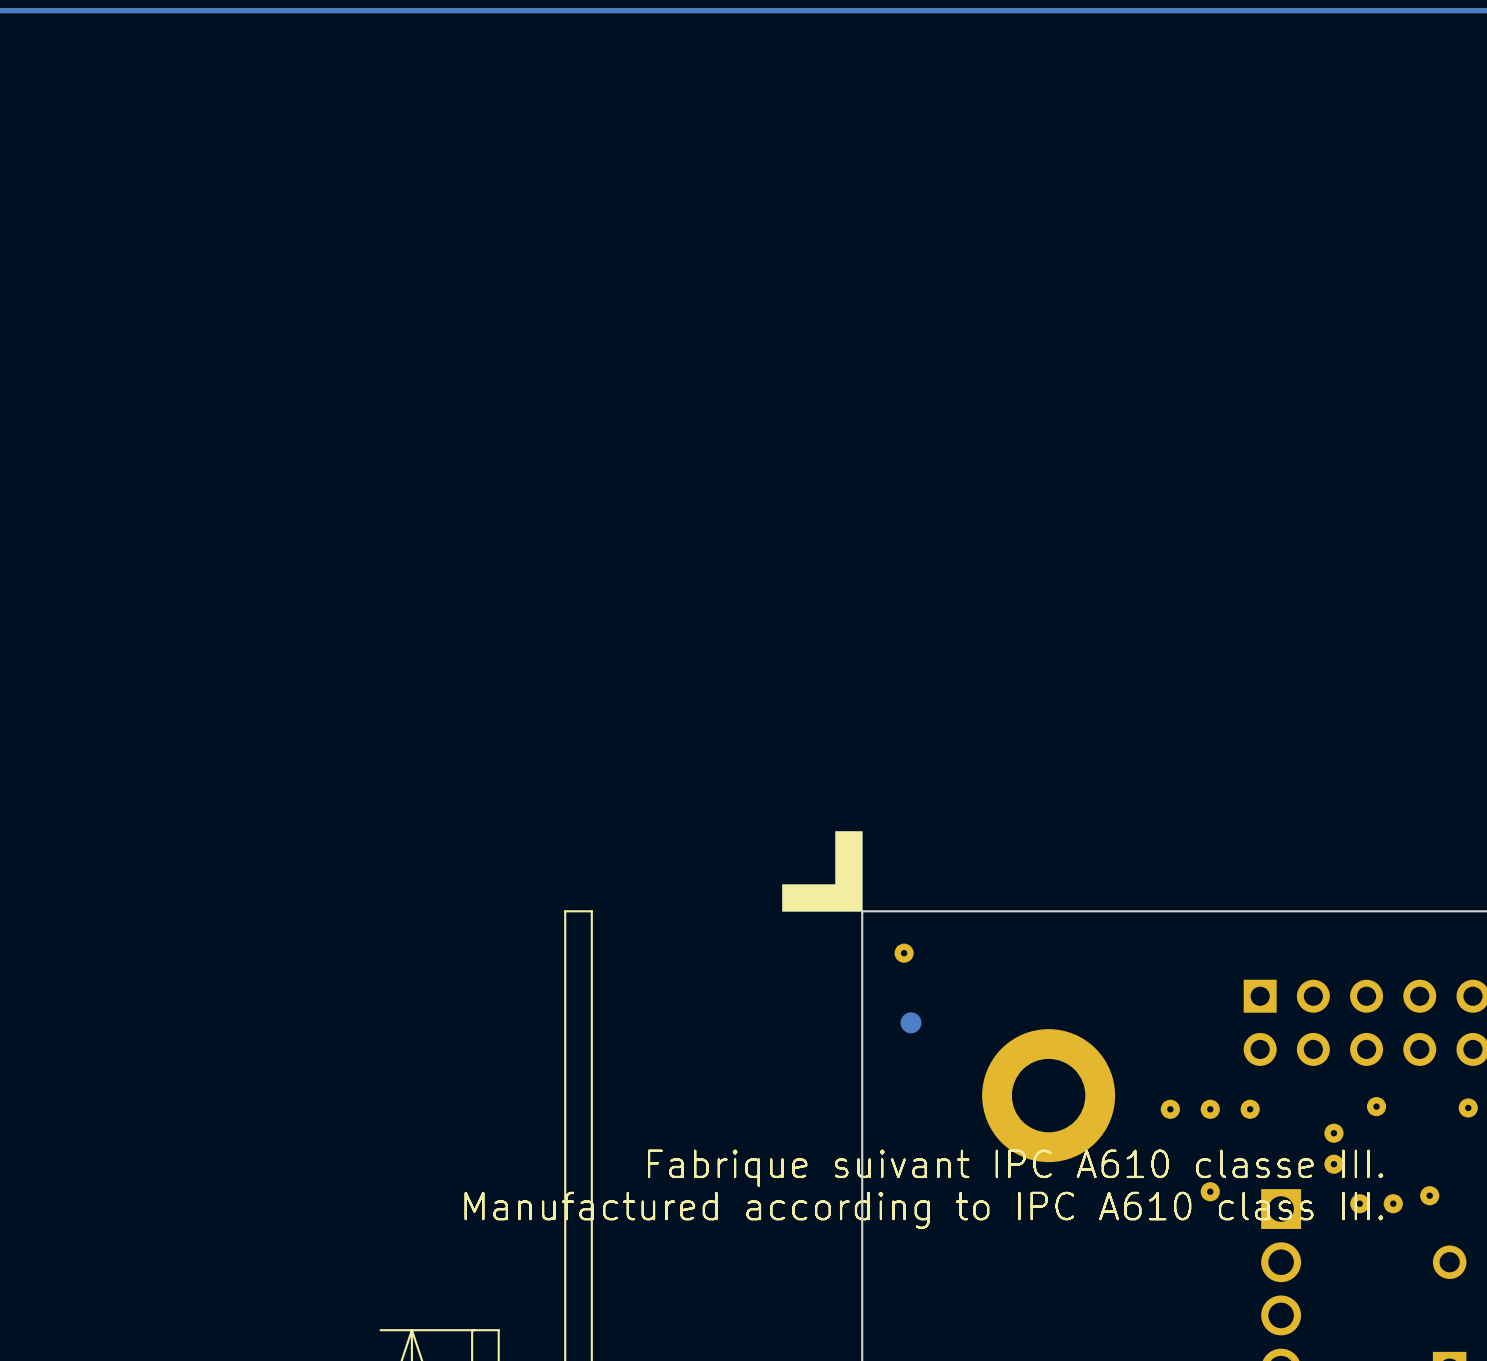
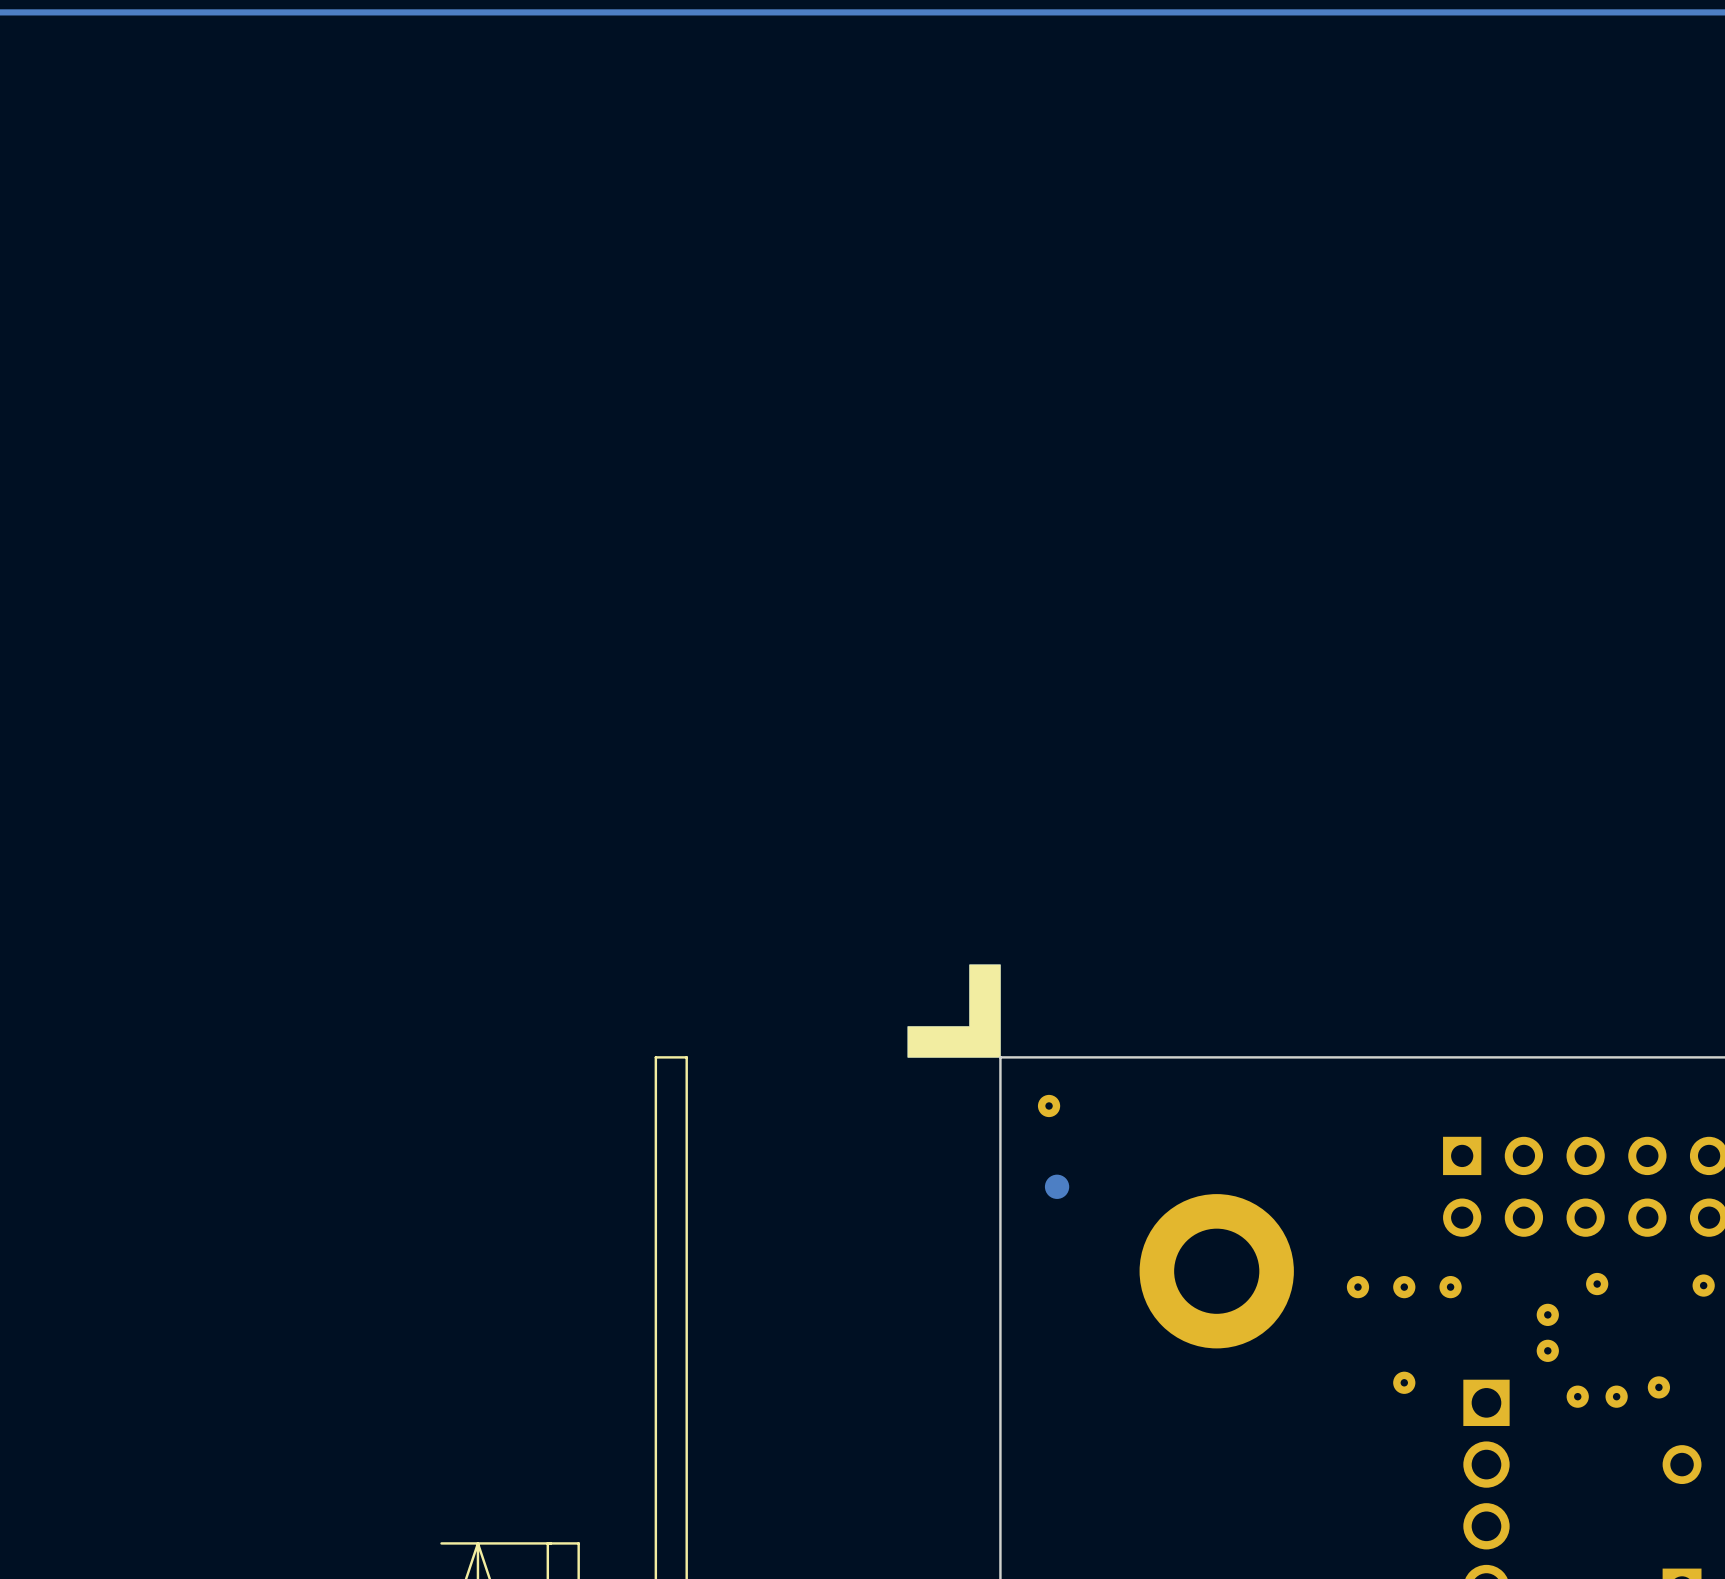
text: Fabrique suivant IPC A610 classe III. (1015, 1168) -> none
text: Manufactured according to IPC A610 class III. (923, 1210) -> none

